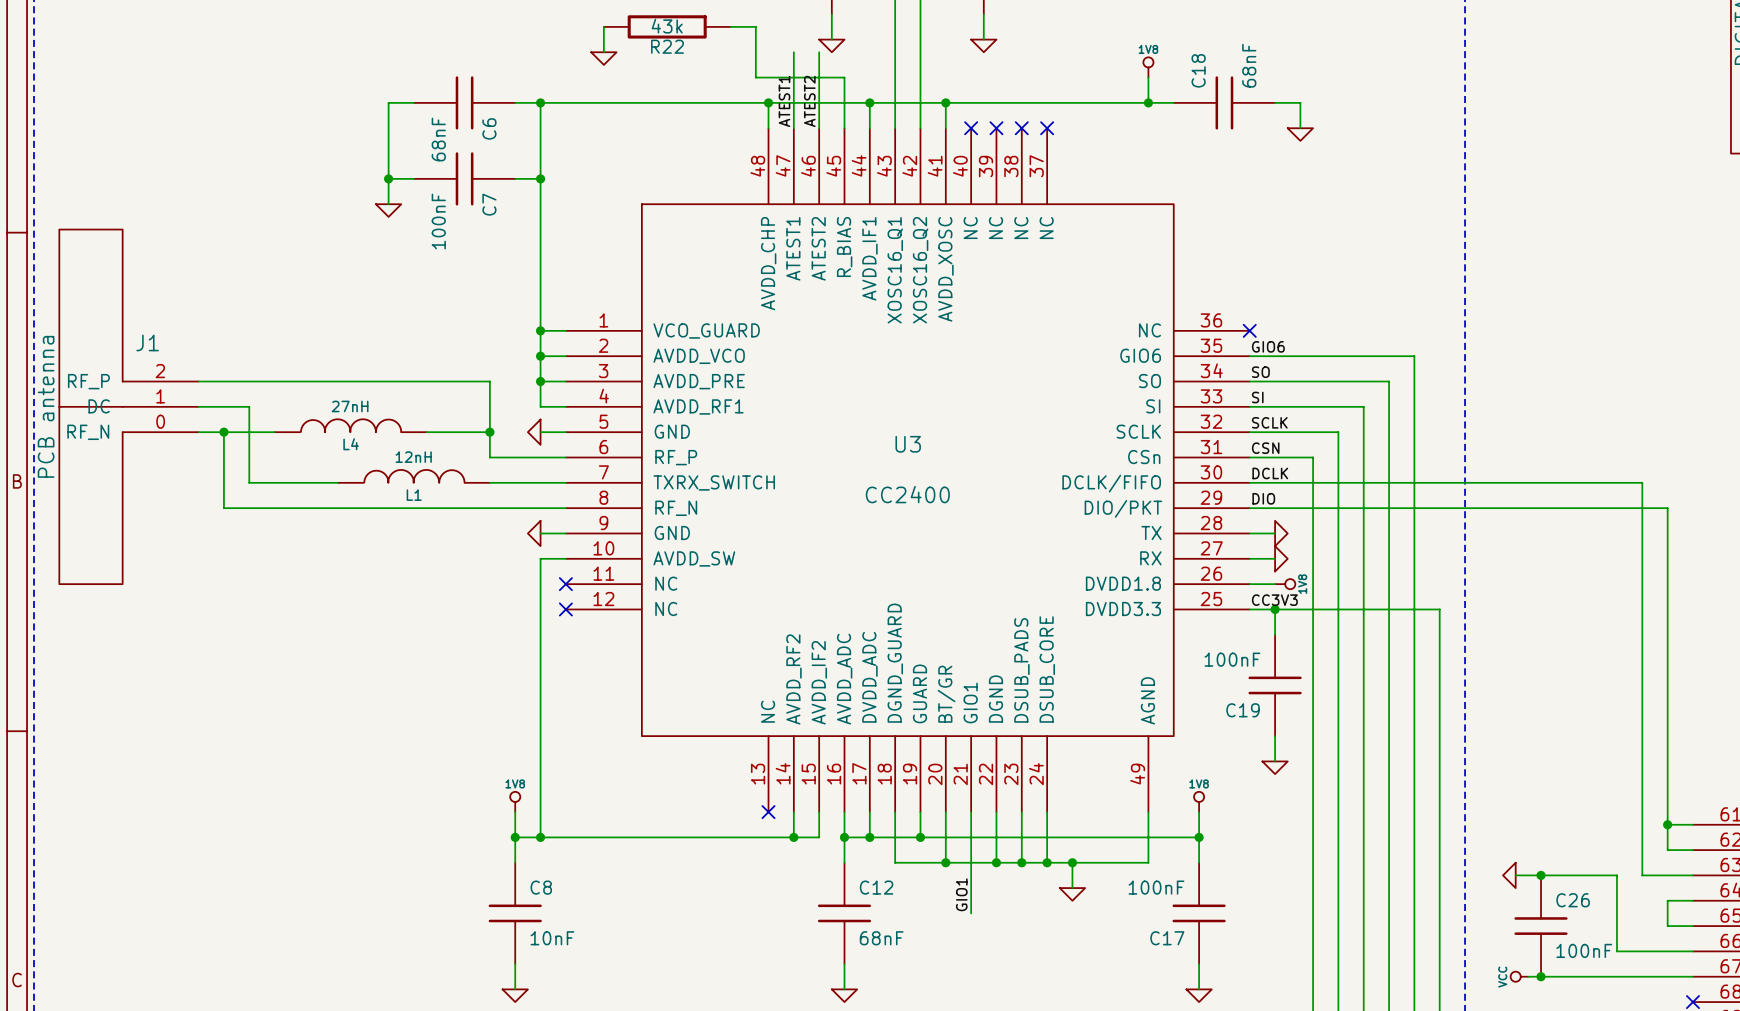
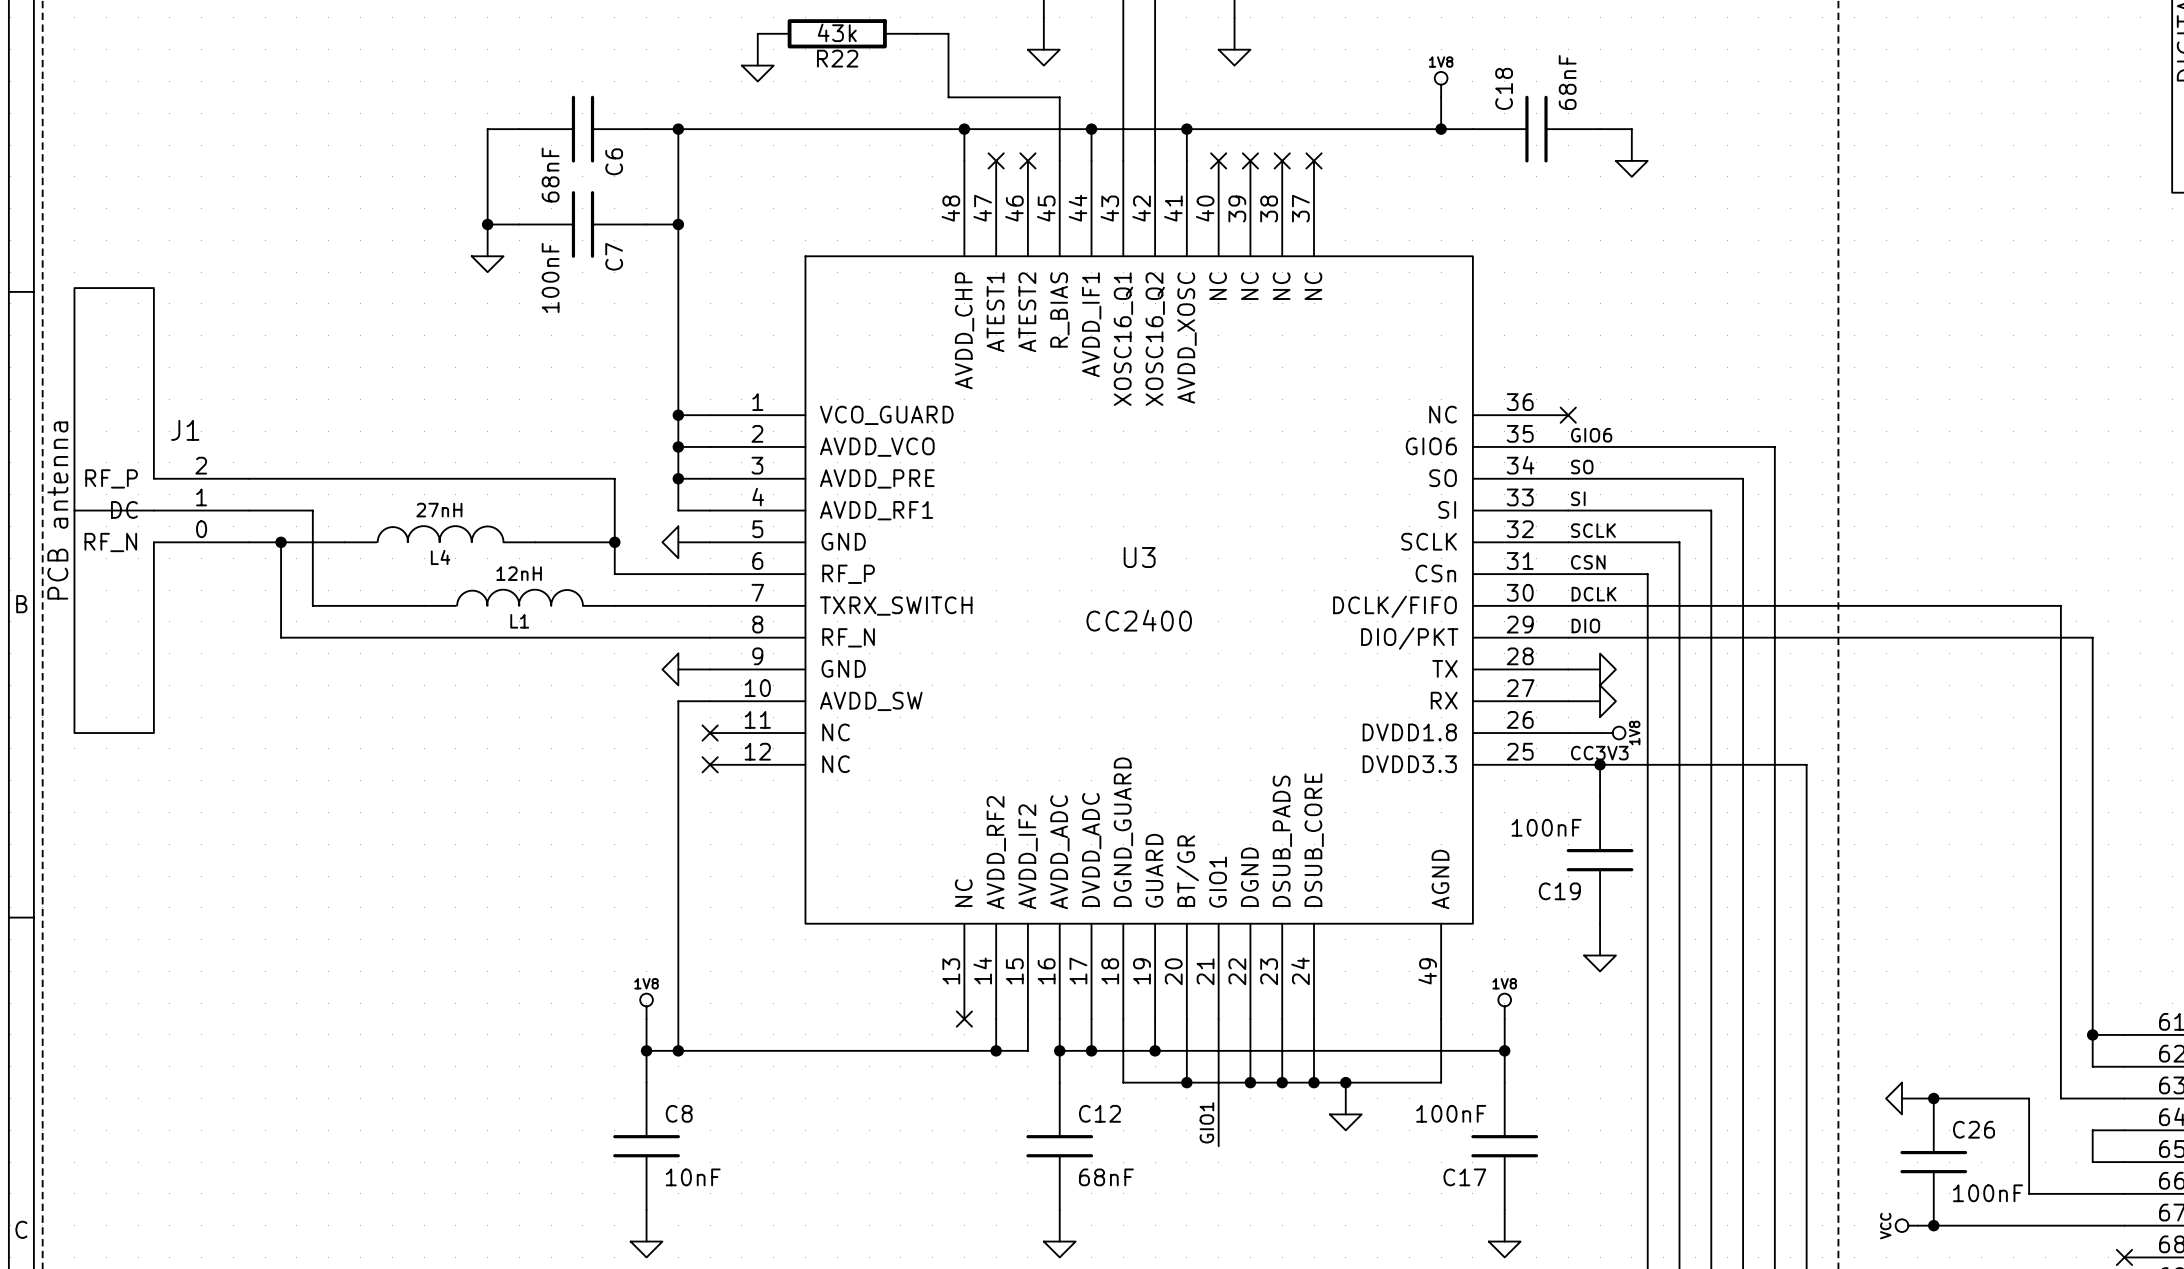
wire: (793, 52) (793, 128) -> none
wire: (819, 52) (819, 128) -> none
label: ATEST1 (784, 101) -> none
label: ATEST2 (809, 101) -> none
no-connect mark: none -> (996, 160)
no-connect mark: none -> (1027, 160)

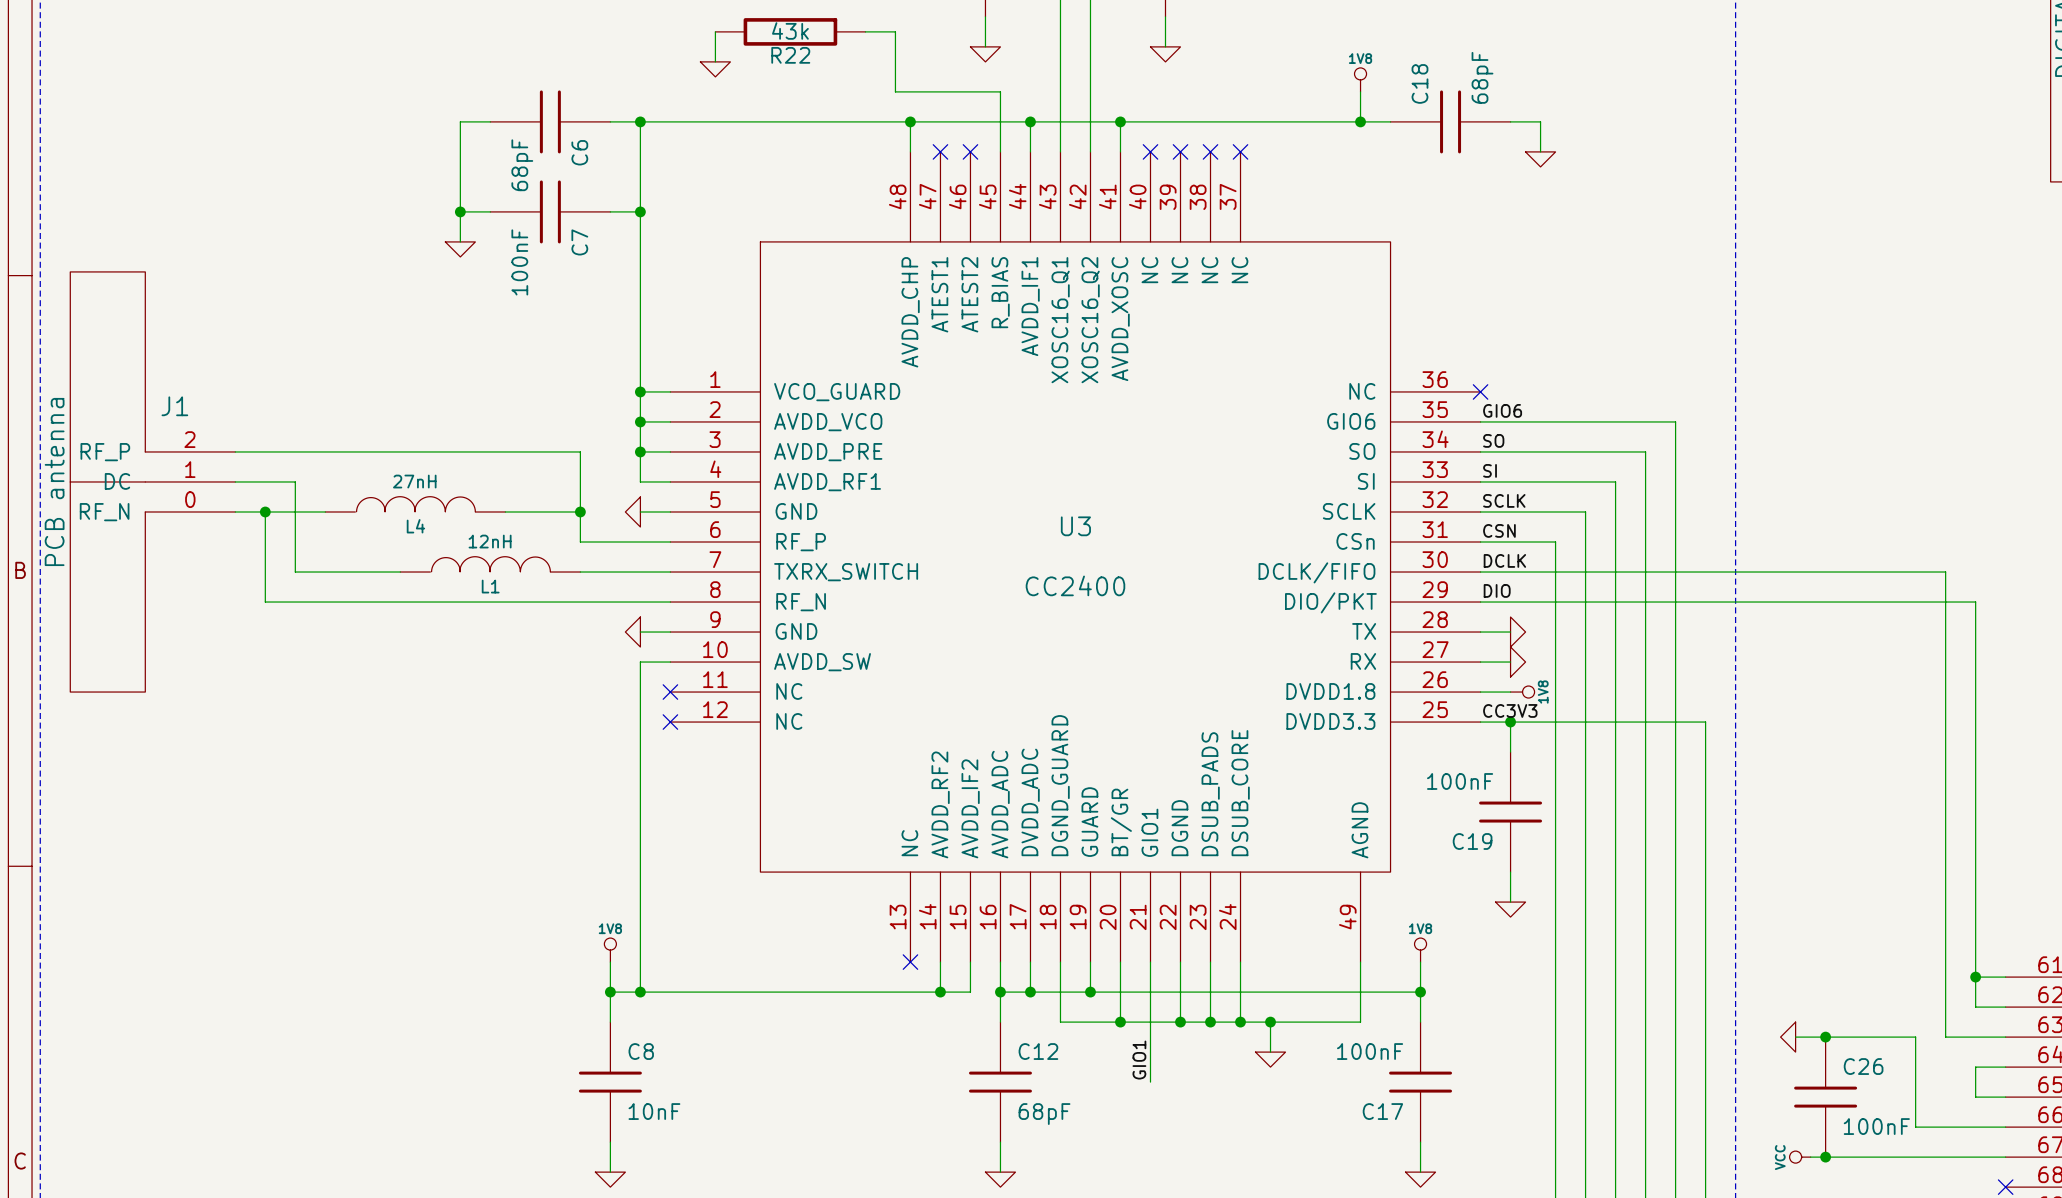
C18 value: 68nF (1567, 82) -> 68pF (1482, 77)
C6 value: 68nF (550, 175) -> 68pF (522, 165)
C12 value: 68nF (1106, 1177) -> 68pF (1044, 1114)

